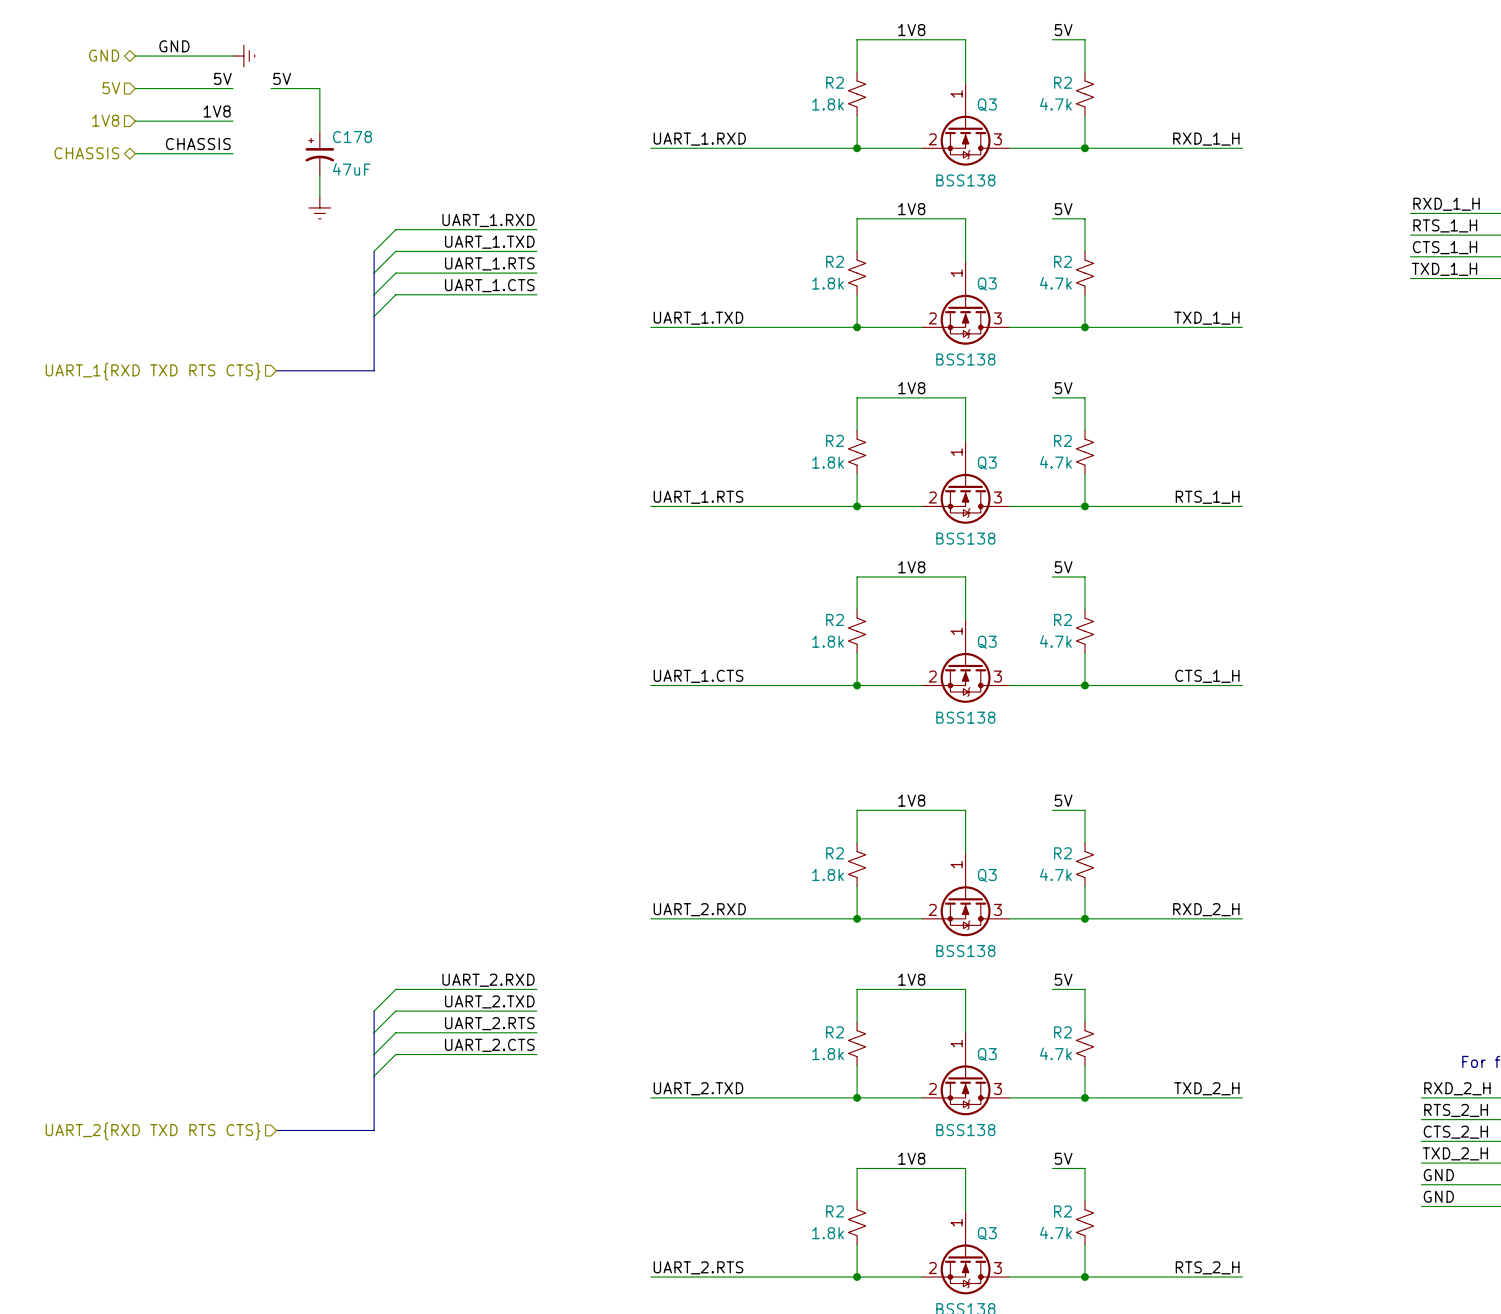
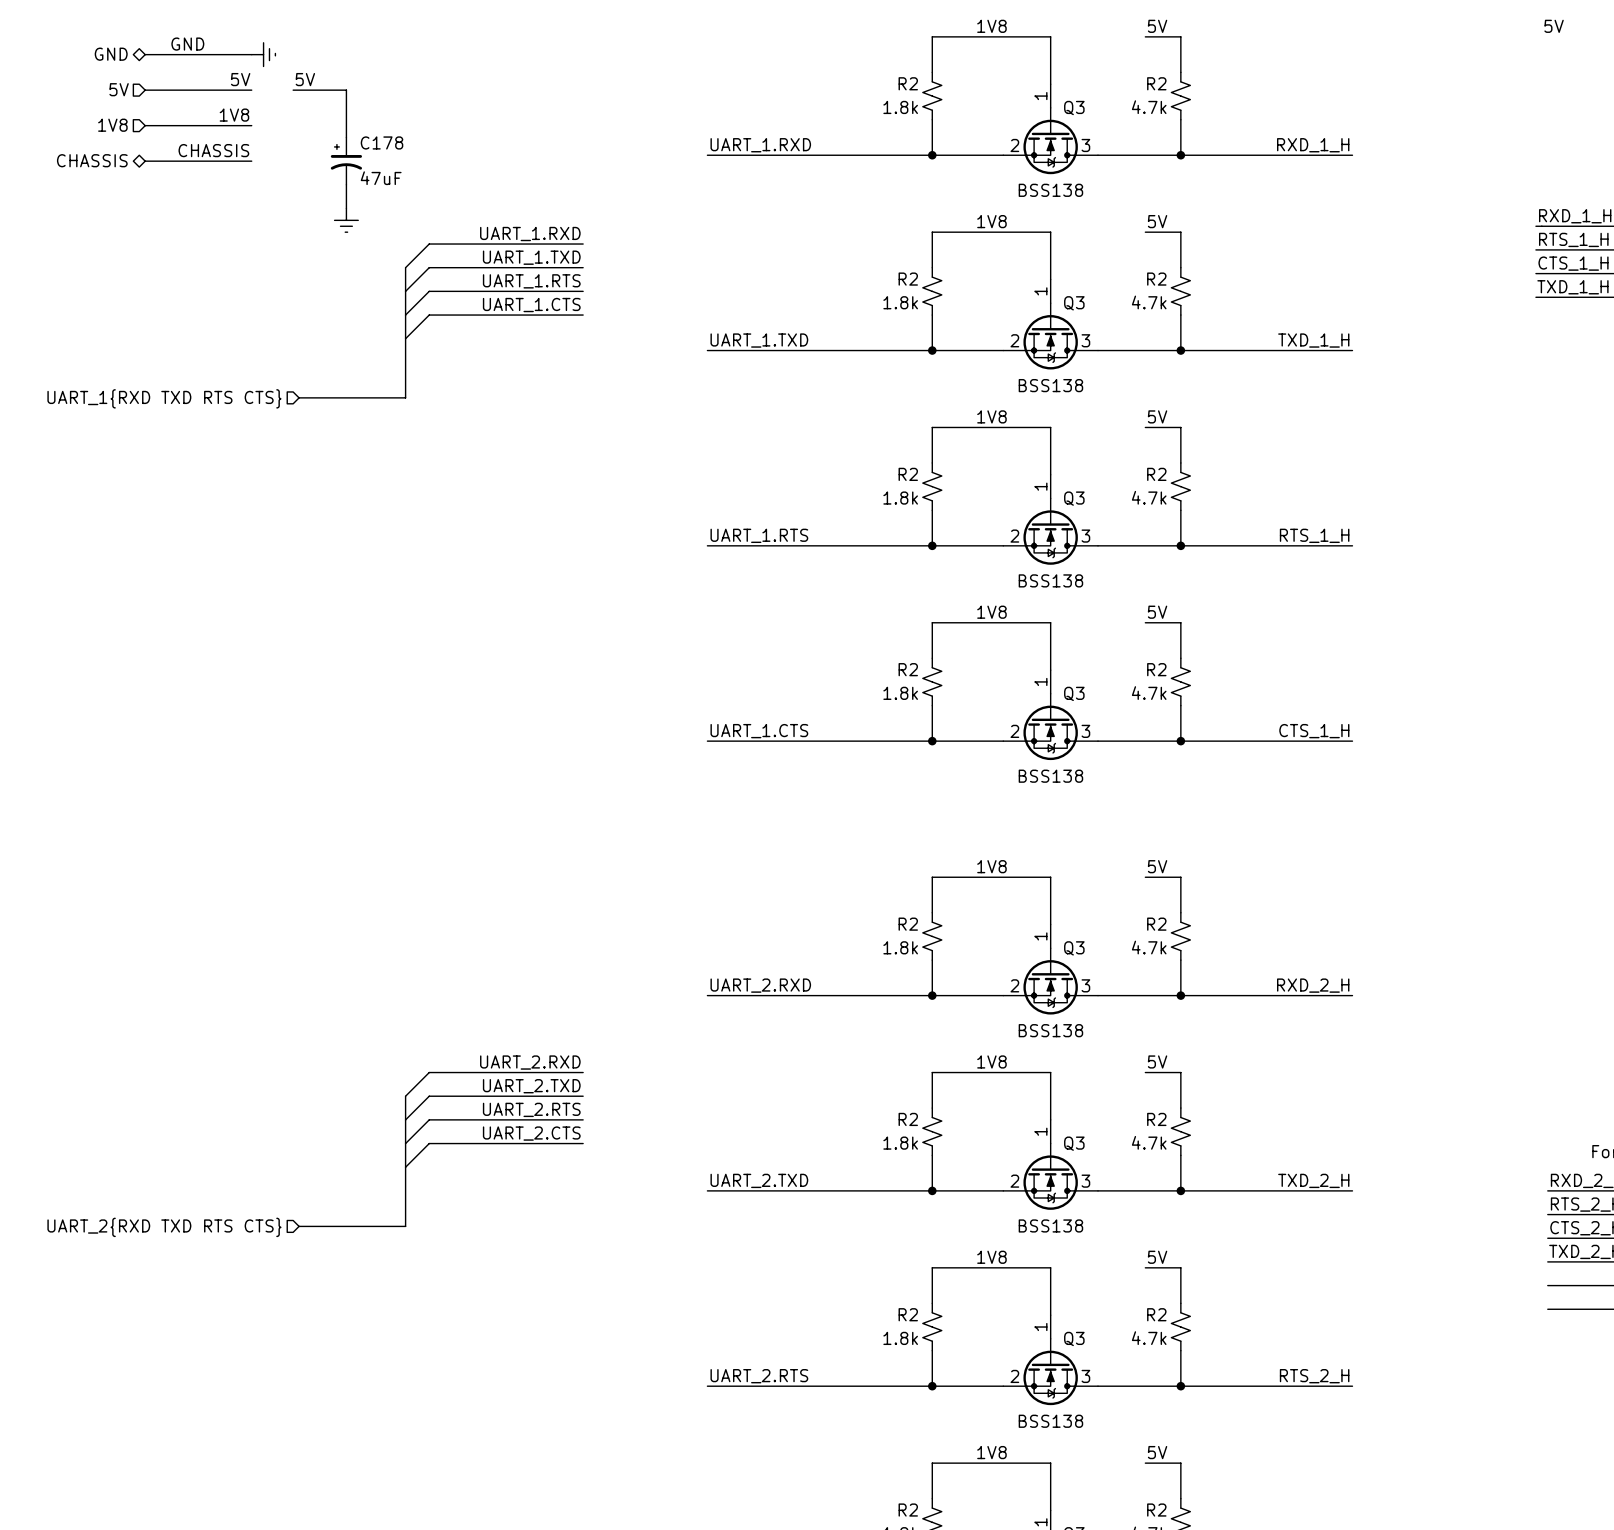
label: none -> 5V (1554, 26)
label: GND (1438, 1175) -> none
label: GND (1438, 1196) -> none

